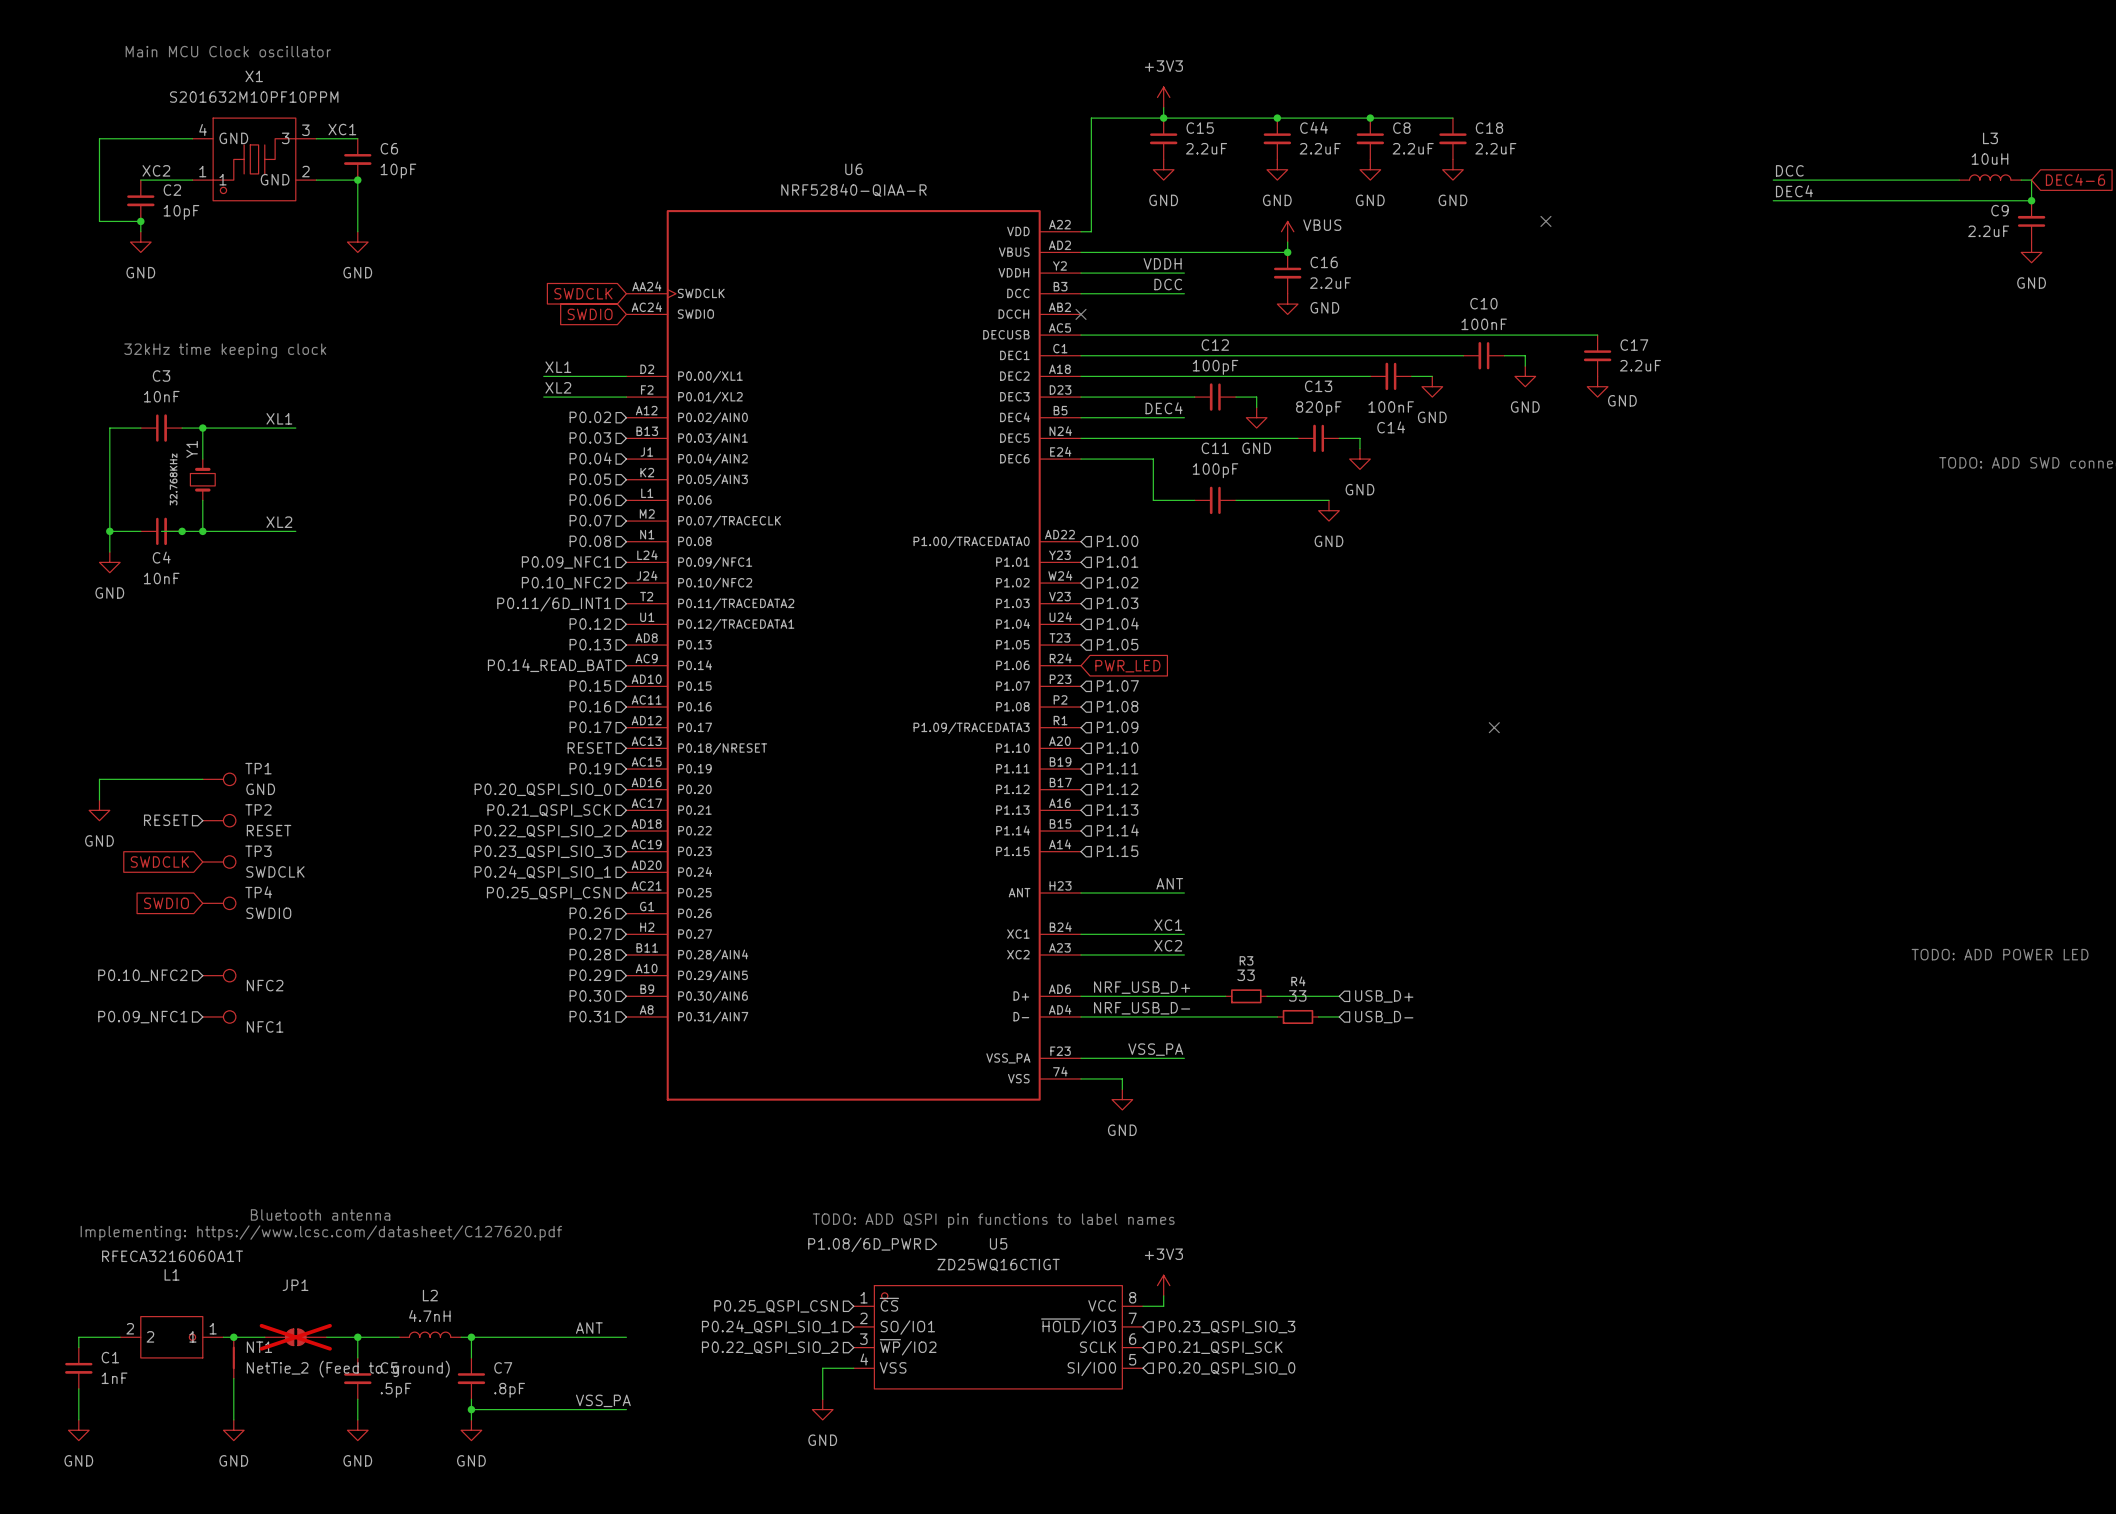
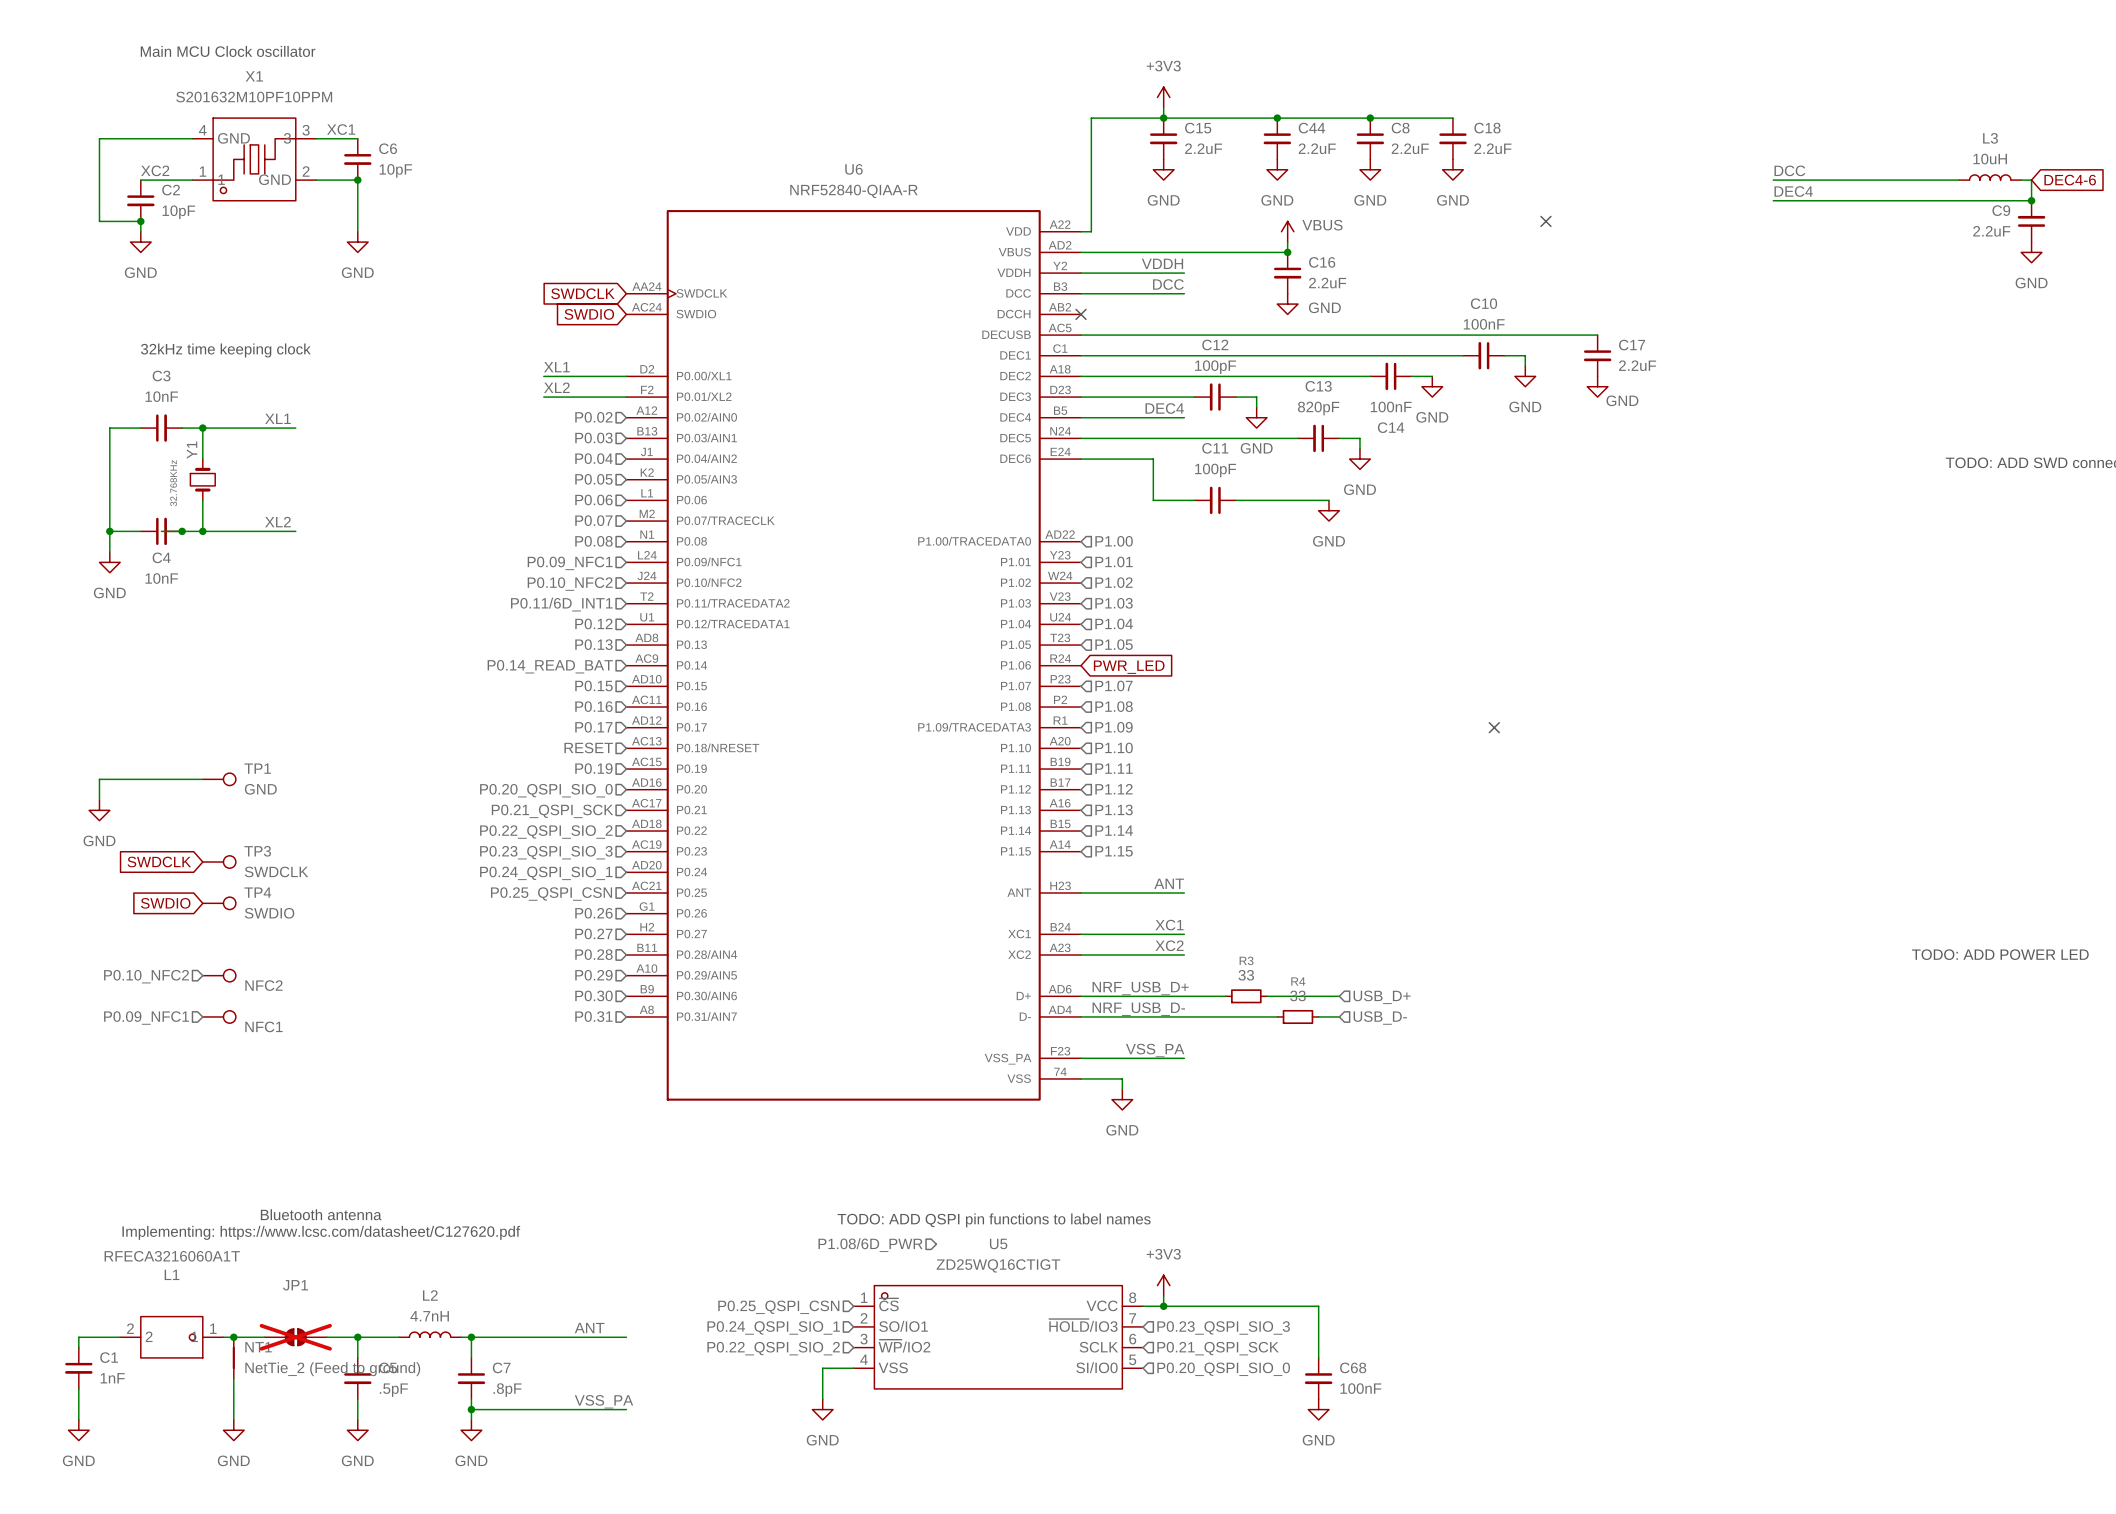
hierarchical label: RESET (166, 820) -> none
TP2: RESET (219, 820) -> none
wire: none -> (1163, 1306) (1318, 1306) (1318, 1357)
junction: none -> (1163, 1306)
C68: none -> 100nF (1318, 1378)
power symbol: none -> GND (1318, 1409)

